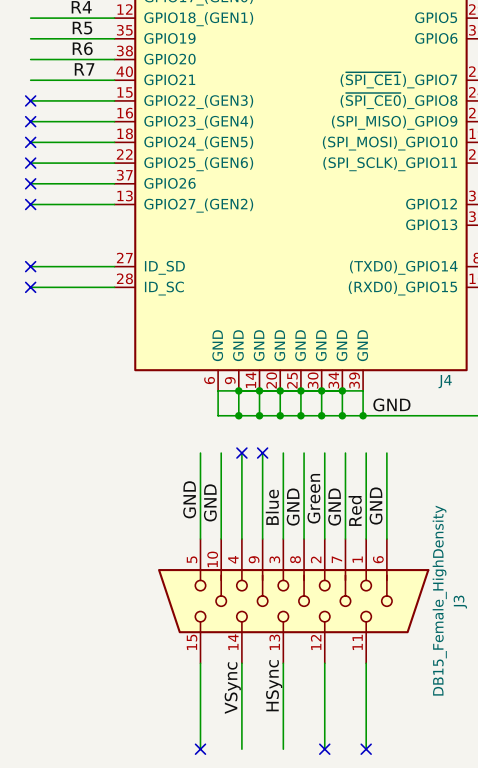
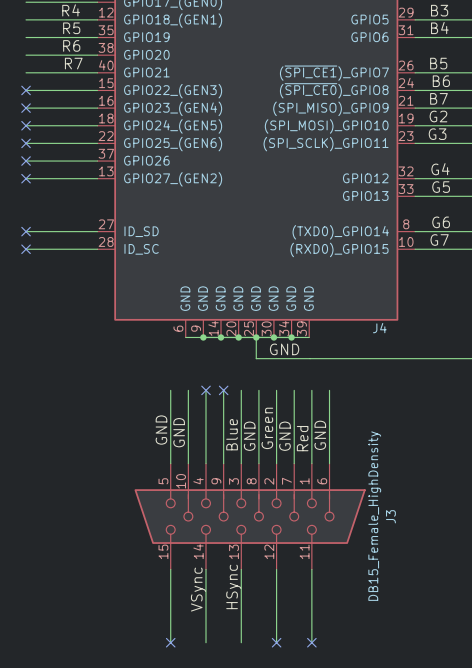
wire: (218, 390) (218, 415) (300, 415) -> none
wire: (238, 390) (238, 415) -> none
wire: (259, 390) (259, 415) -> none
wire: (280, 390) (280, 415) -> none
wire: (321, 390) (321, 415) -> none
wire: (342, 390) (342, 415) -> none
wire: (363, 390) (363, 415) -> none
label position: GND (391, 404) -> GND (284, 349)
junction: (238, 415) -> none
junction: (259, 415) -> none
junction: (280, 415) -> none
junction: (300, 415) -> none
junction: (321, 415) -> none
junction: (342, 415) -> none
junction: (363, 415) -> none

